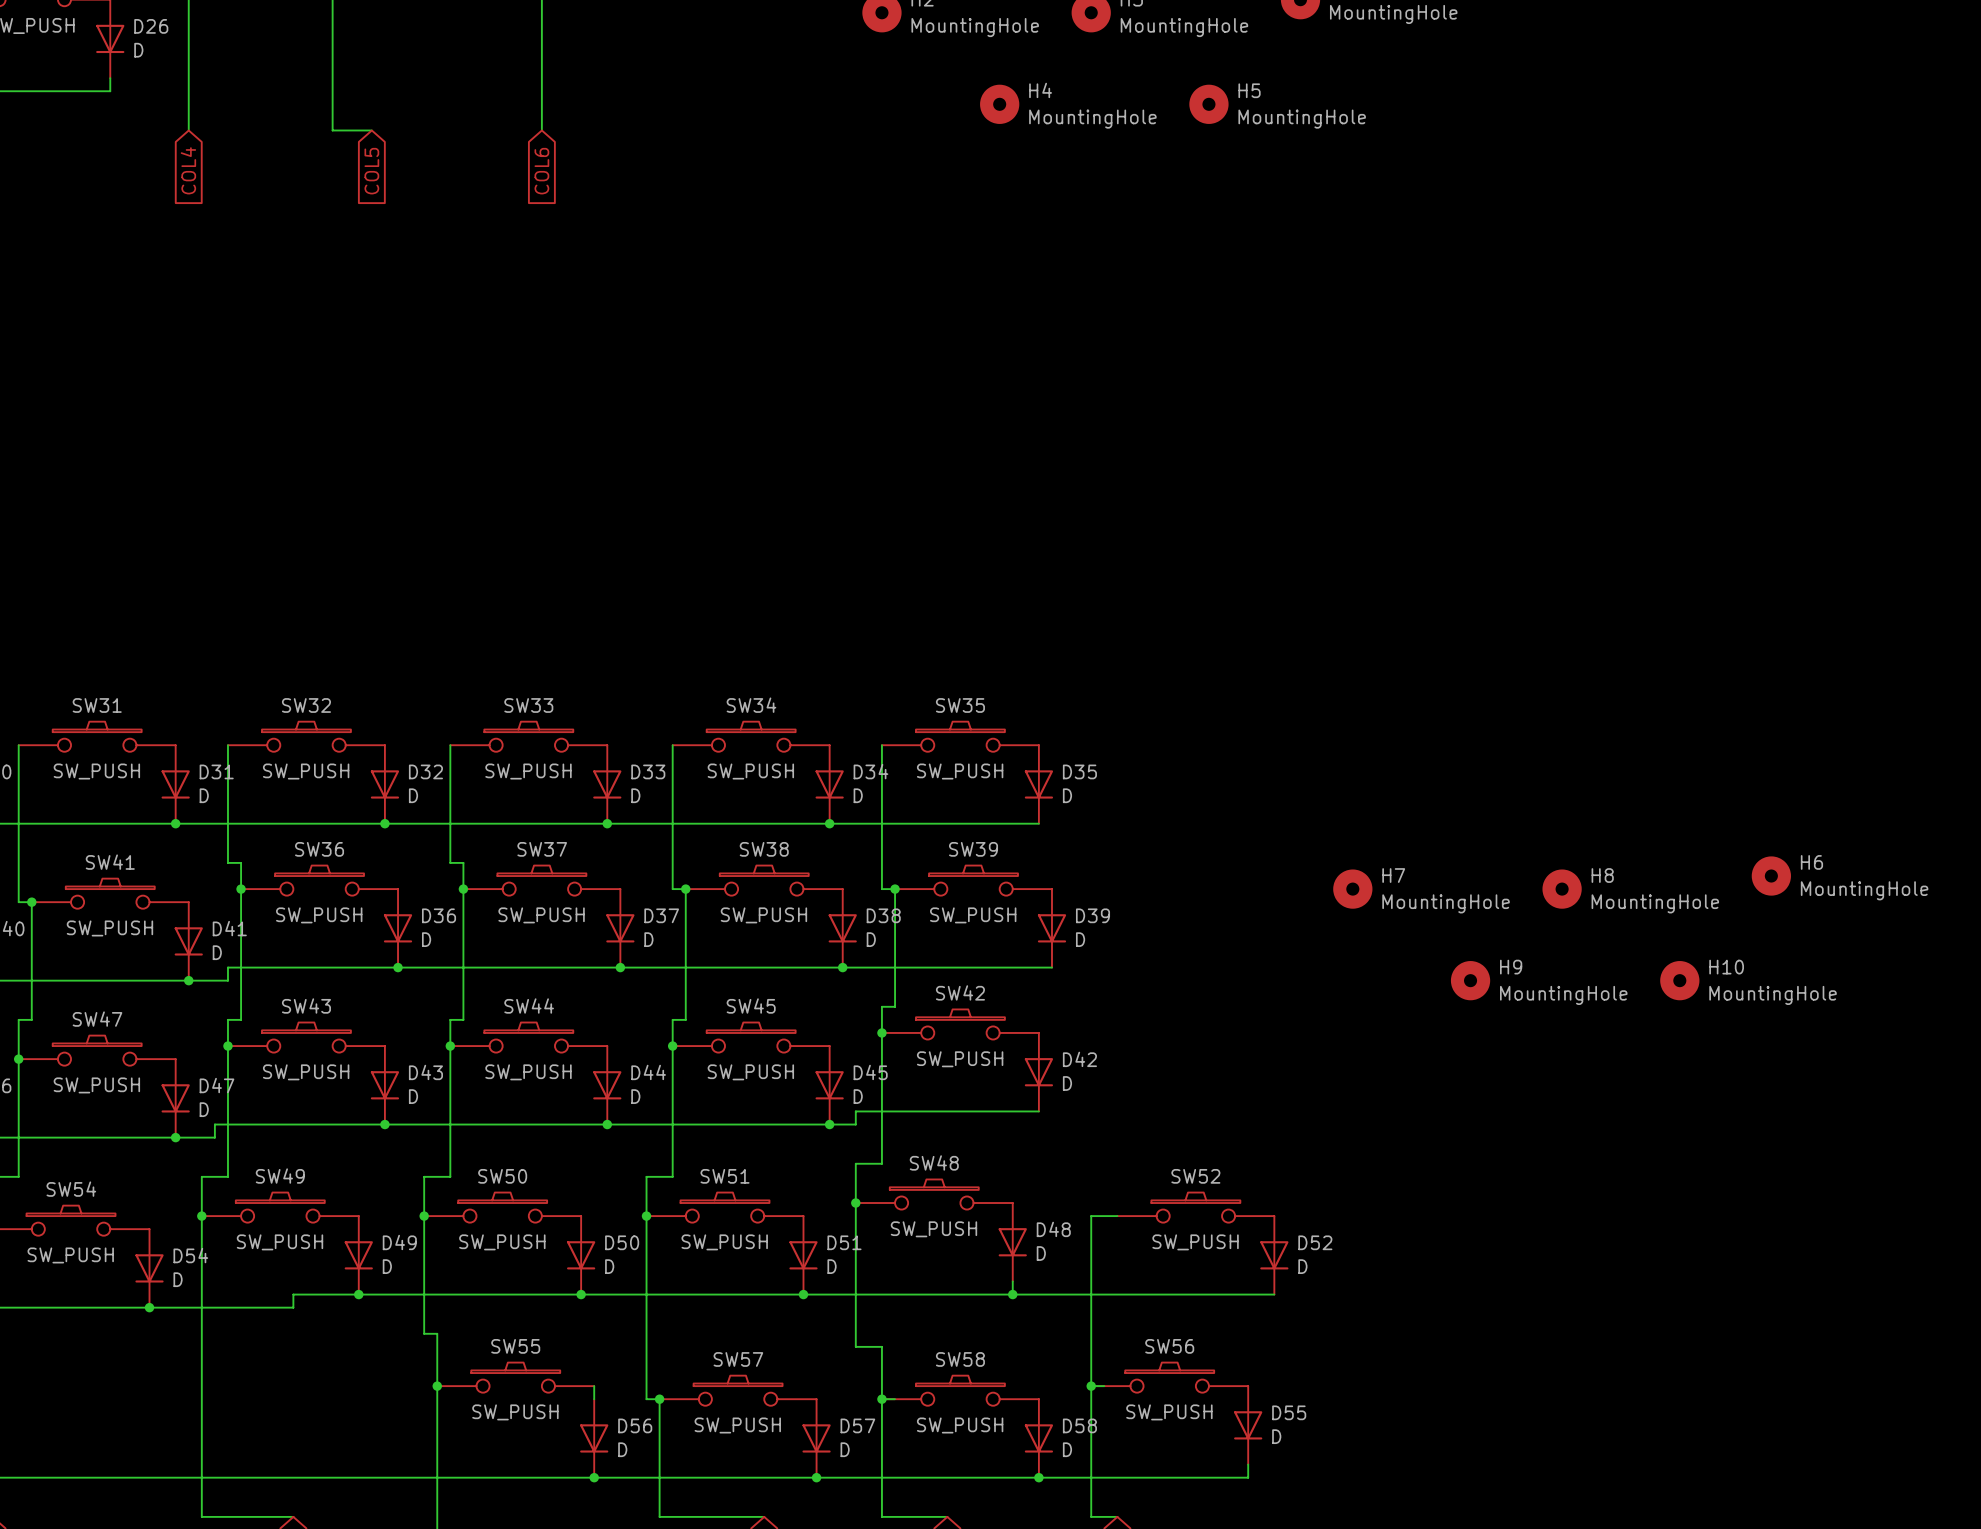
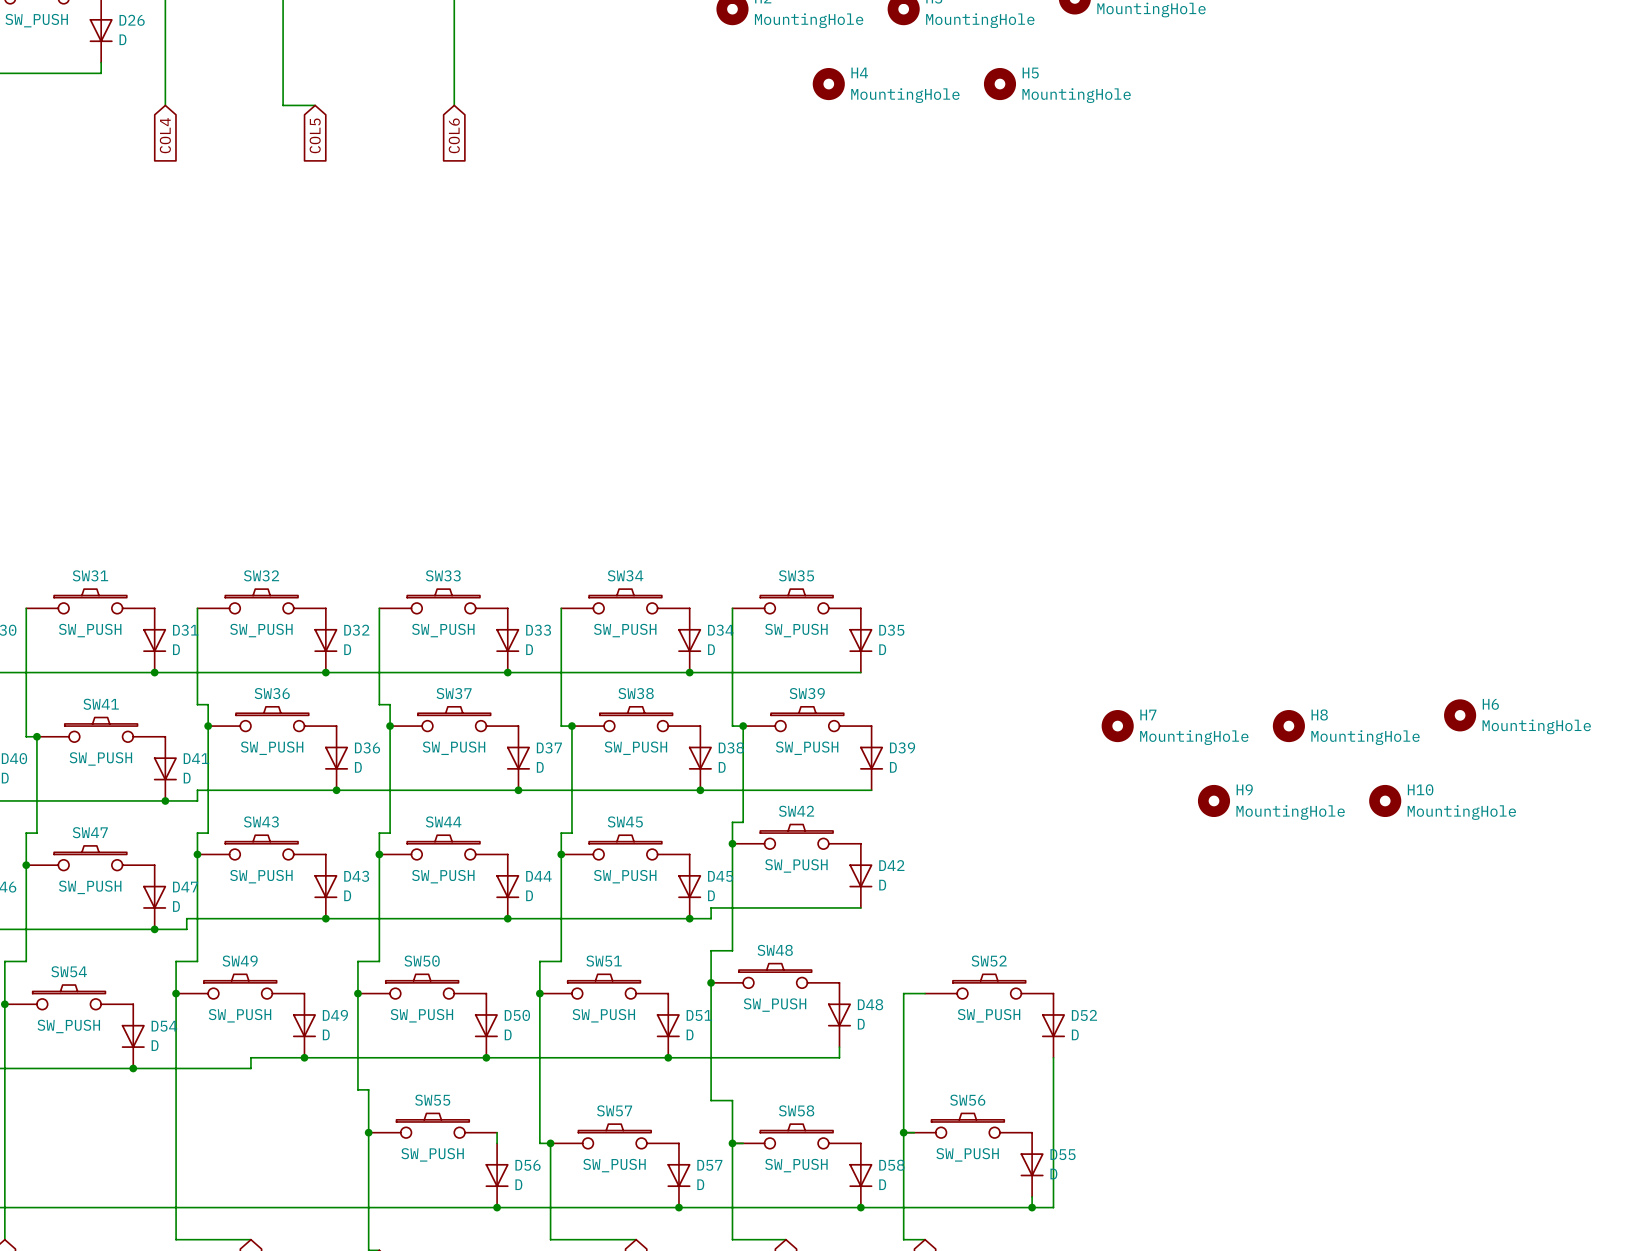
wire: (1012, 1294) (1274, 1294) -> (1032, 1207) (1053, 1207) (1053, 1057)
junction: (1012, 1294) -> none
junction: none -> (1032, 1207)

